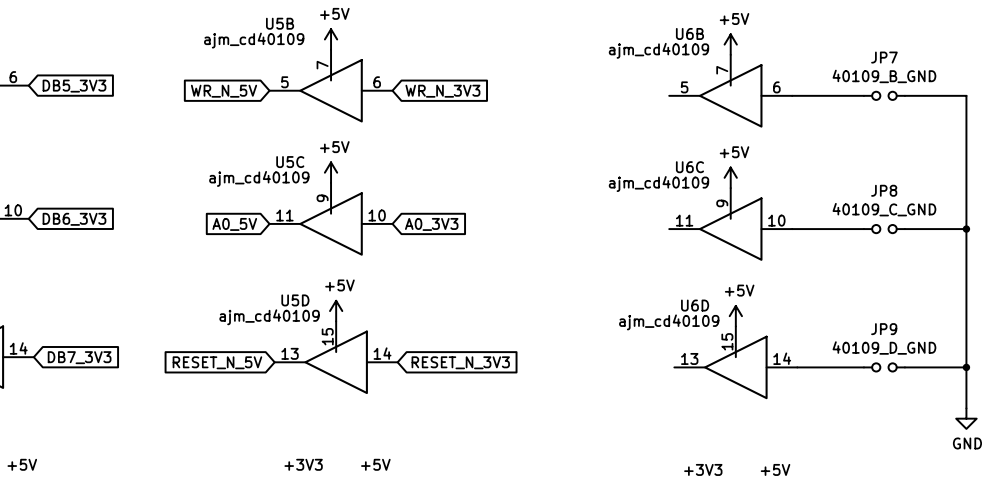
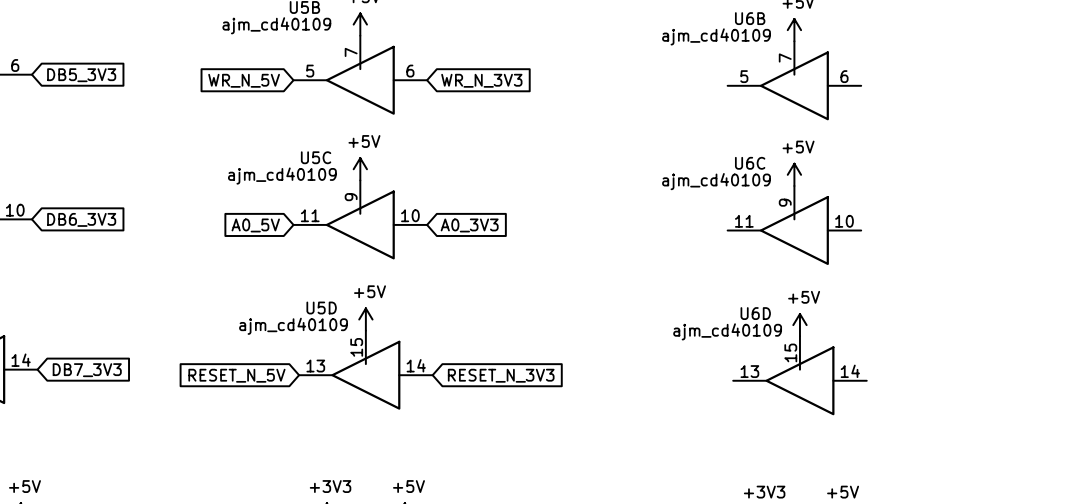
wire: (792, 95) (863, 95) -> none
JP7: 40109_B_GND (884, 95) -> none
wire: (904, 95) (966, 95) (966, 408) -> none
wire: (792, 229) (863, 229) -> none
JP8: 40109_C_GND (884, 229) -> none
wire: (904, 229) (966, 229) -> none
junction: (966, 229) -> none
wire: (797, 367) (863, 367) -> none
JP9: 40109_D_GND (884, 367) -> none
wire: (904, 367) (966, 367) -> none
junction: (966, 367) -> none
power symbol: GND (966, 418) -> none

